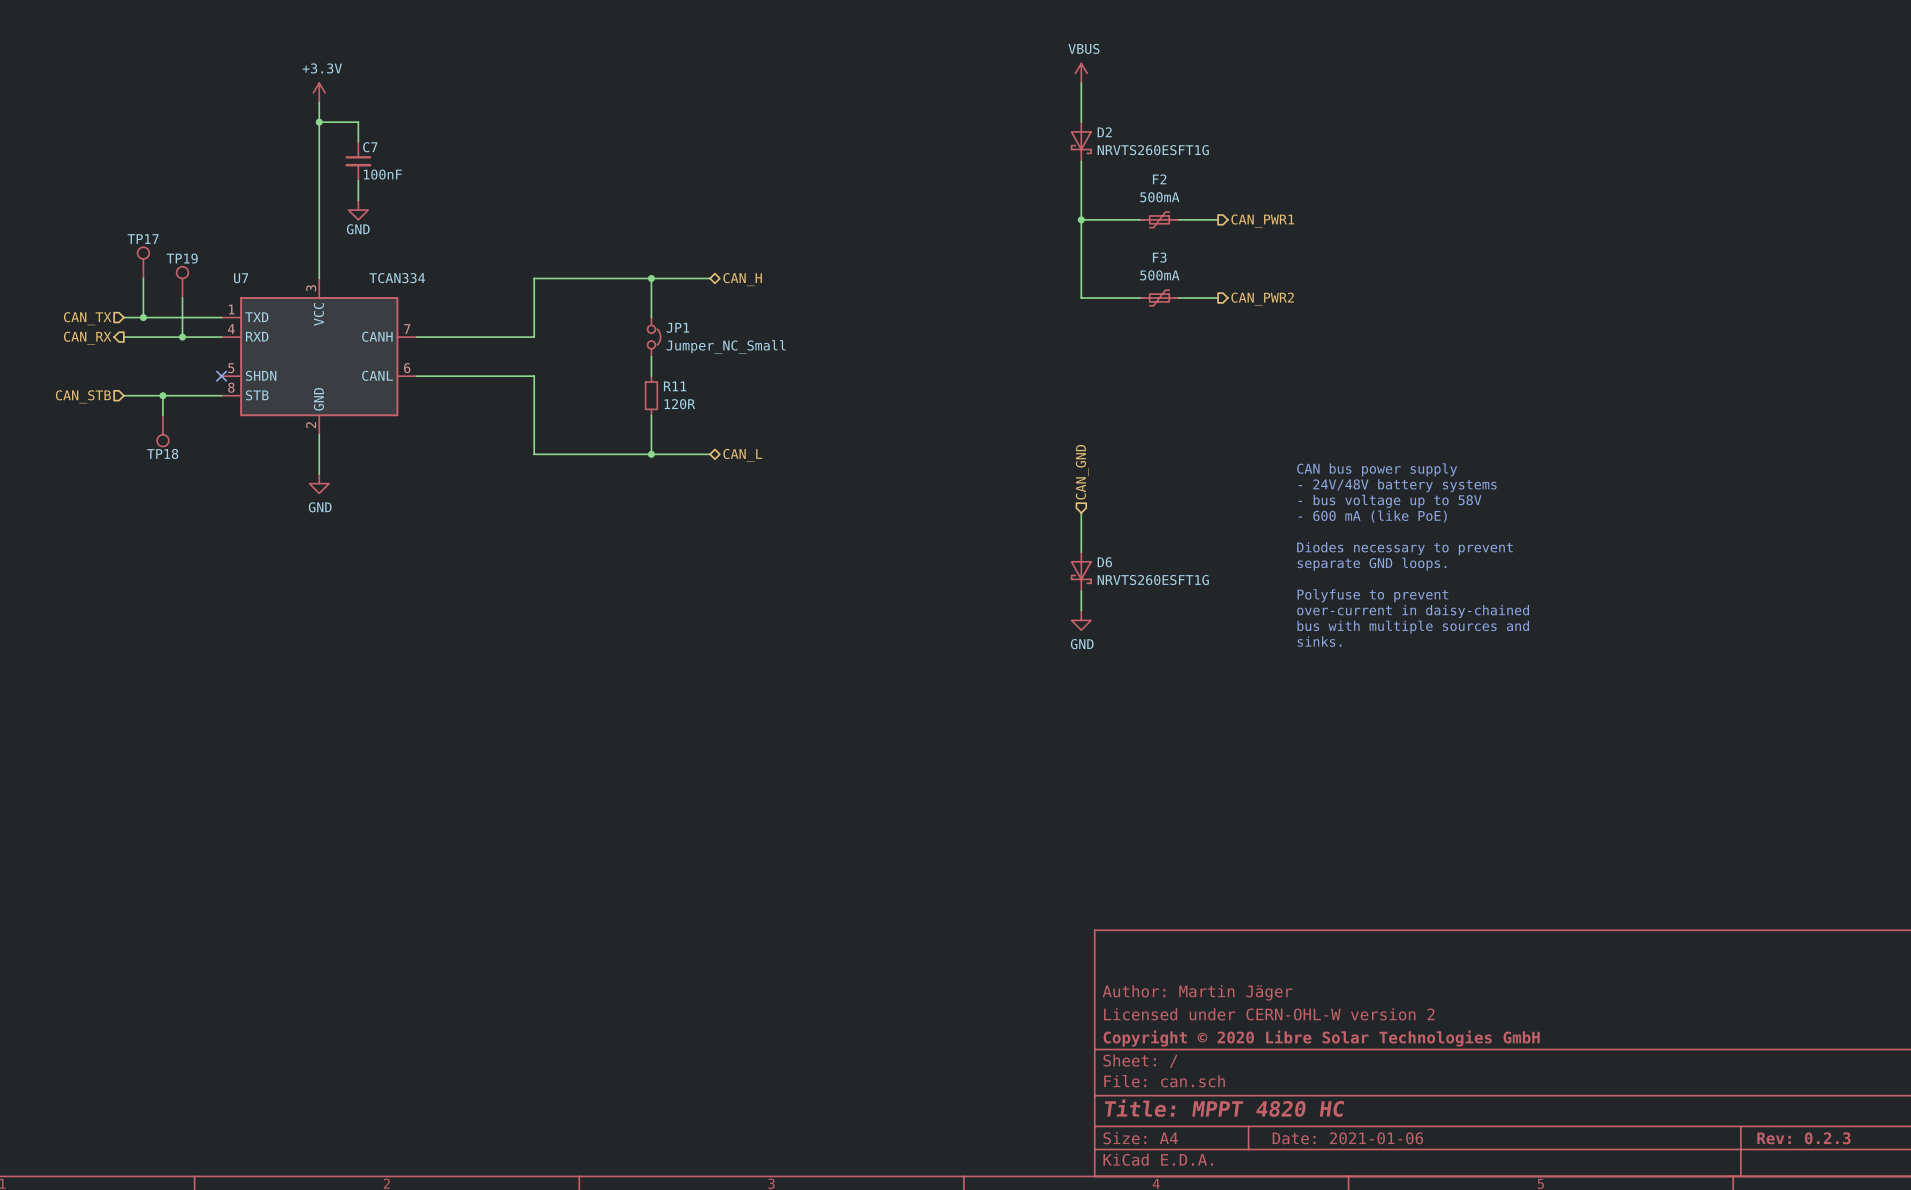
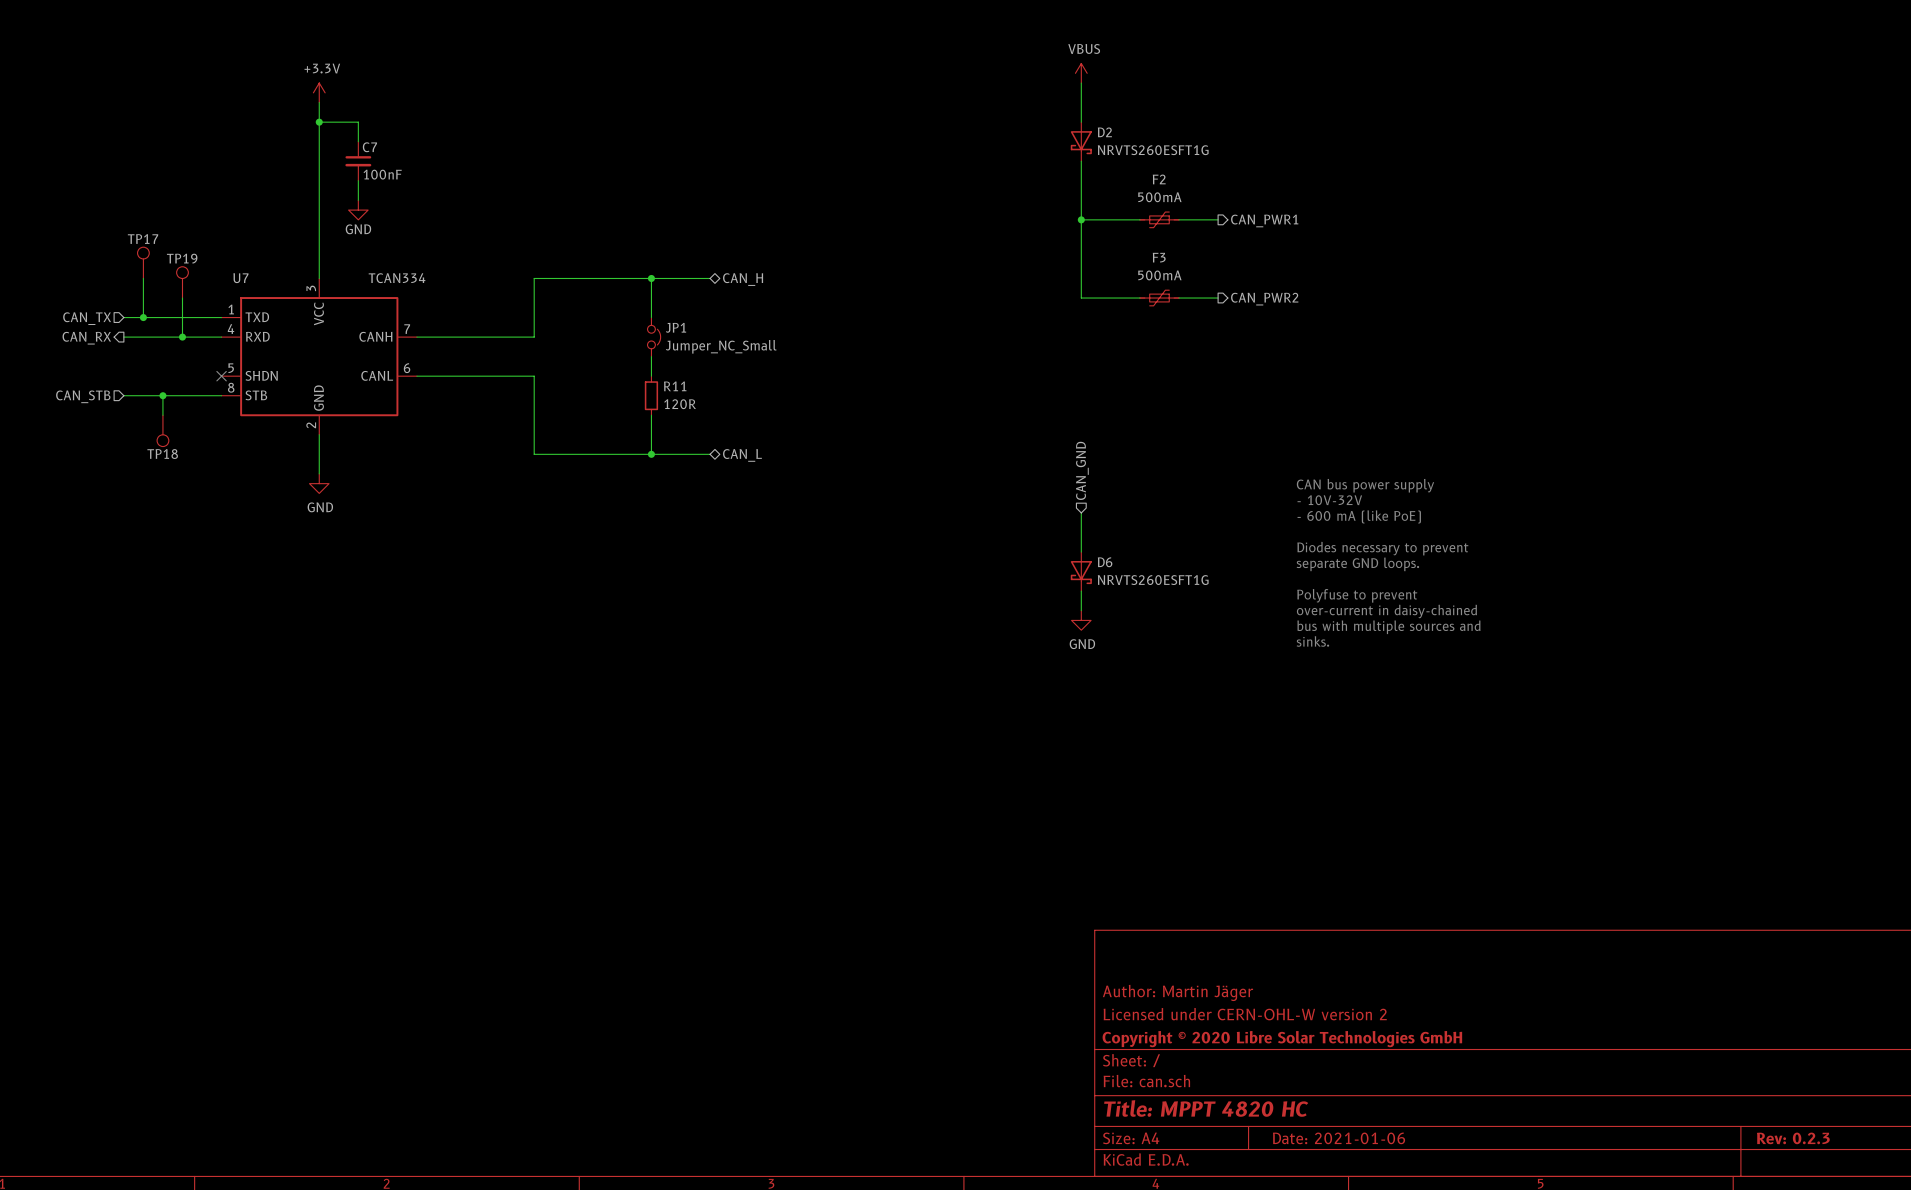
text: CAN bus power supply (1377, 469) -> none
text: - 24V/48V battery systems (1397, 485) -> CAN bus power supply (1365, 485)
text: - bus voltage up to 58V (1390, 501) -> - 10V-32V (1329, 500)

